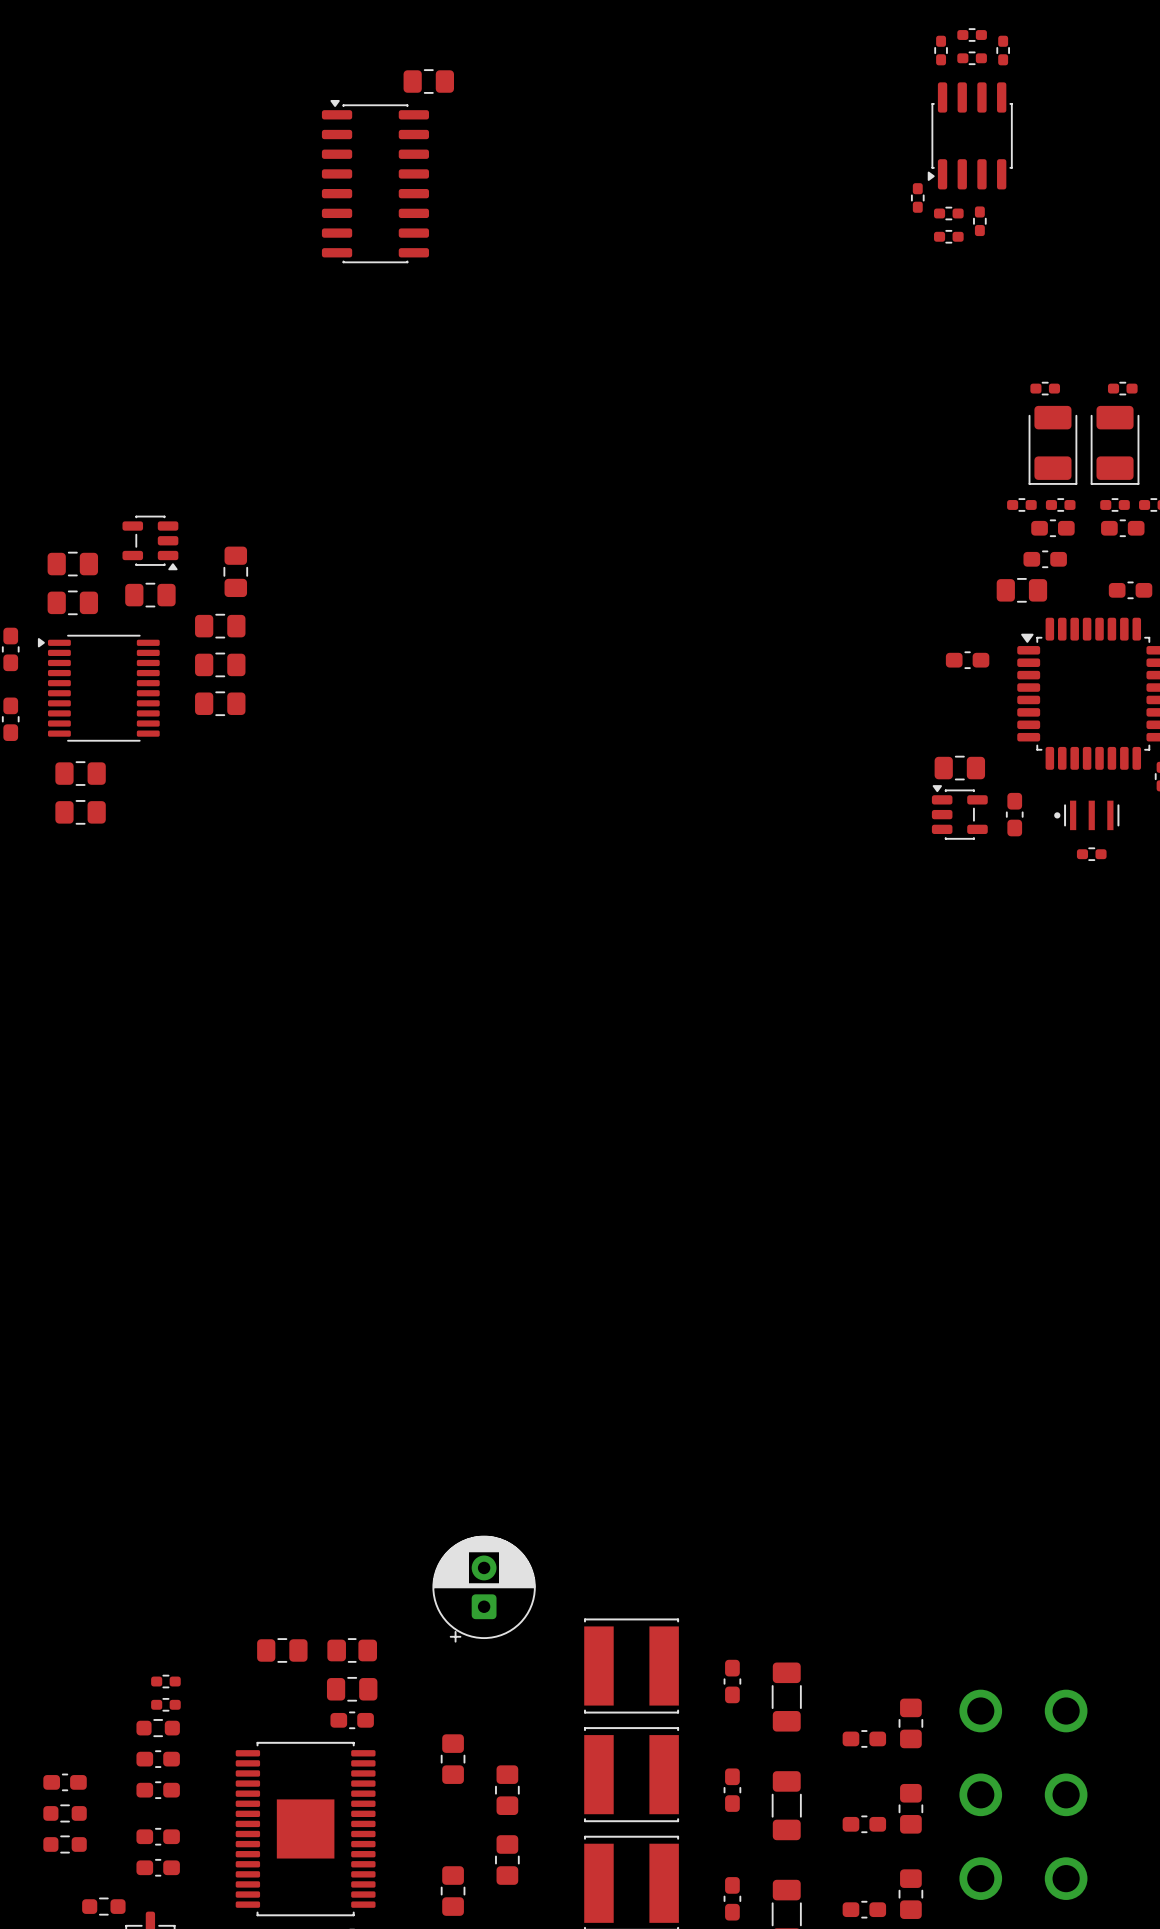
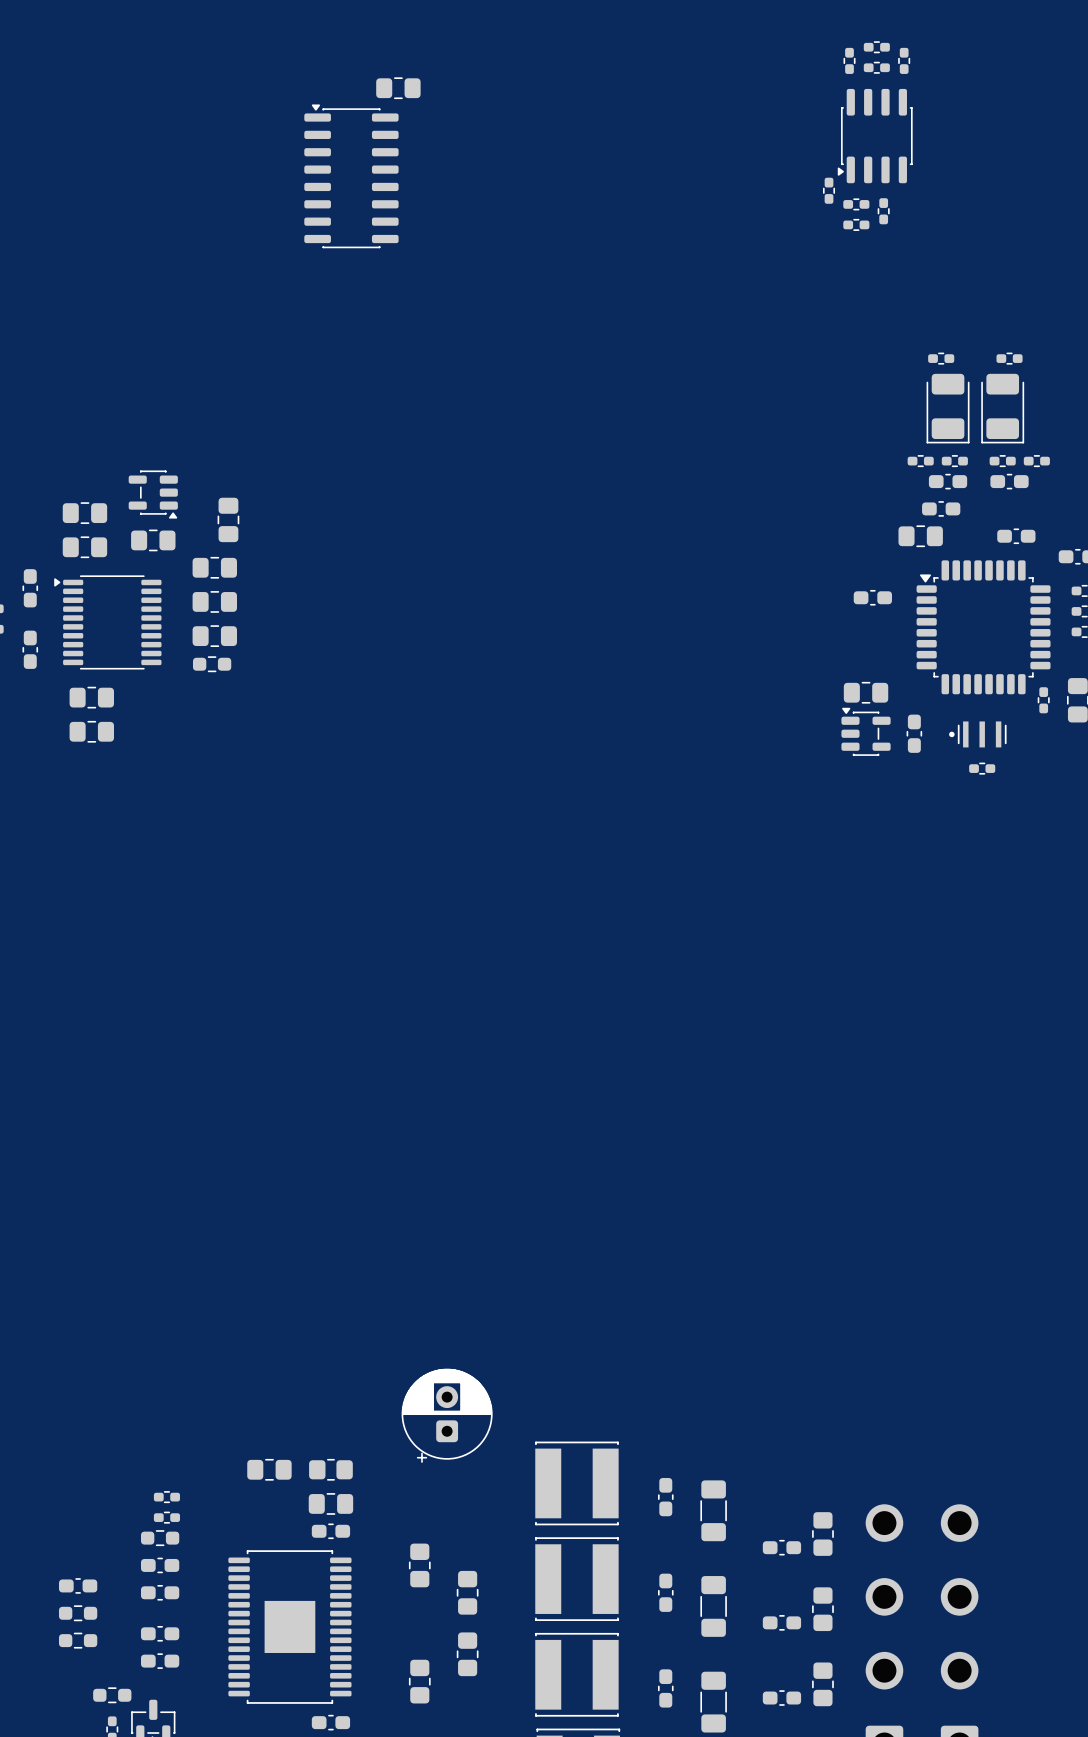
part: none -> (212, 664)

